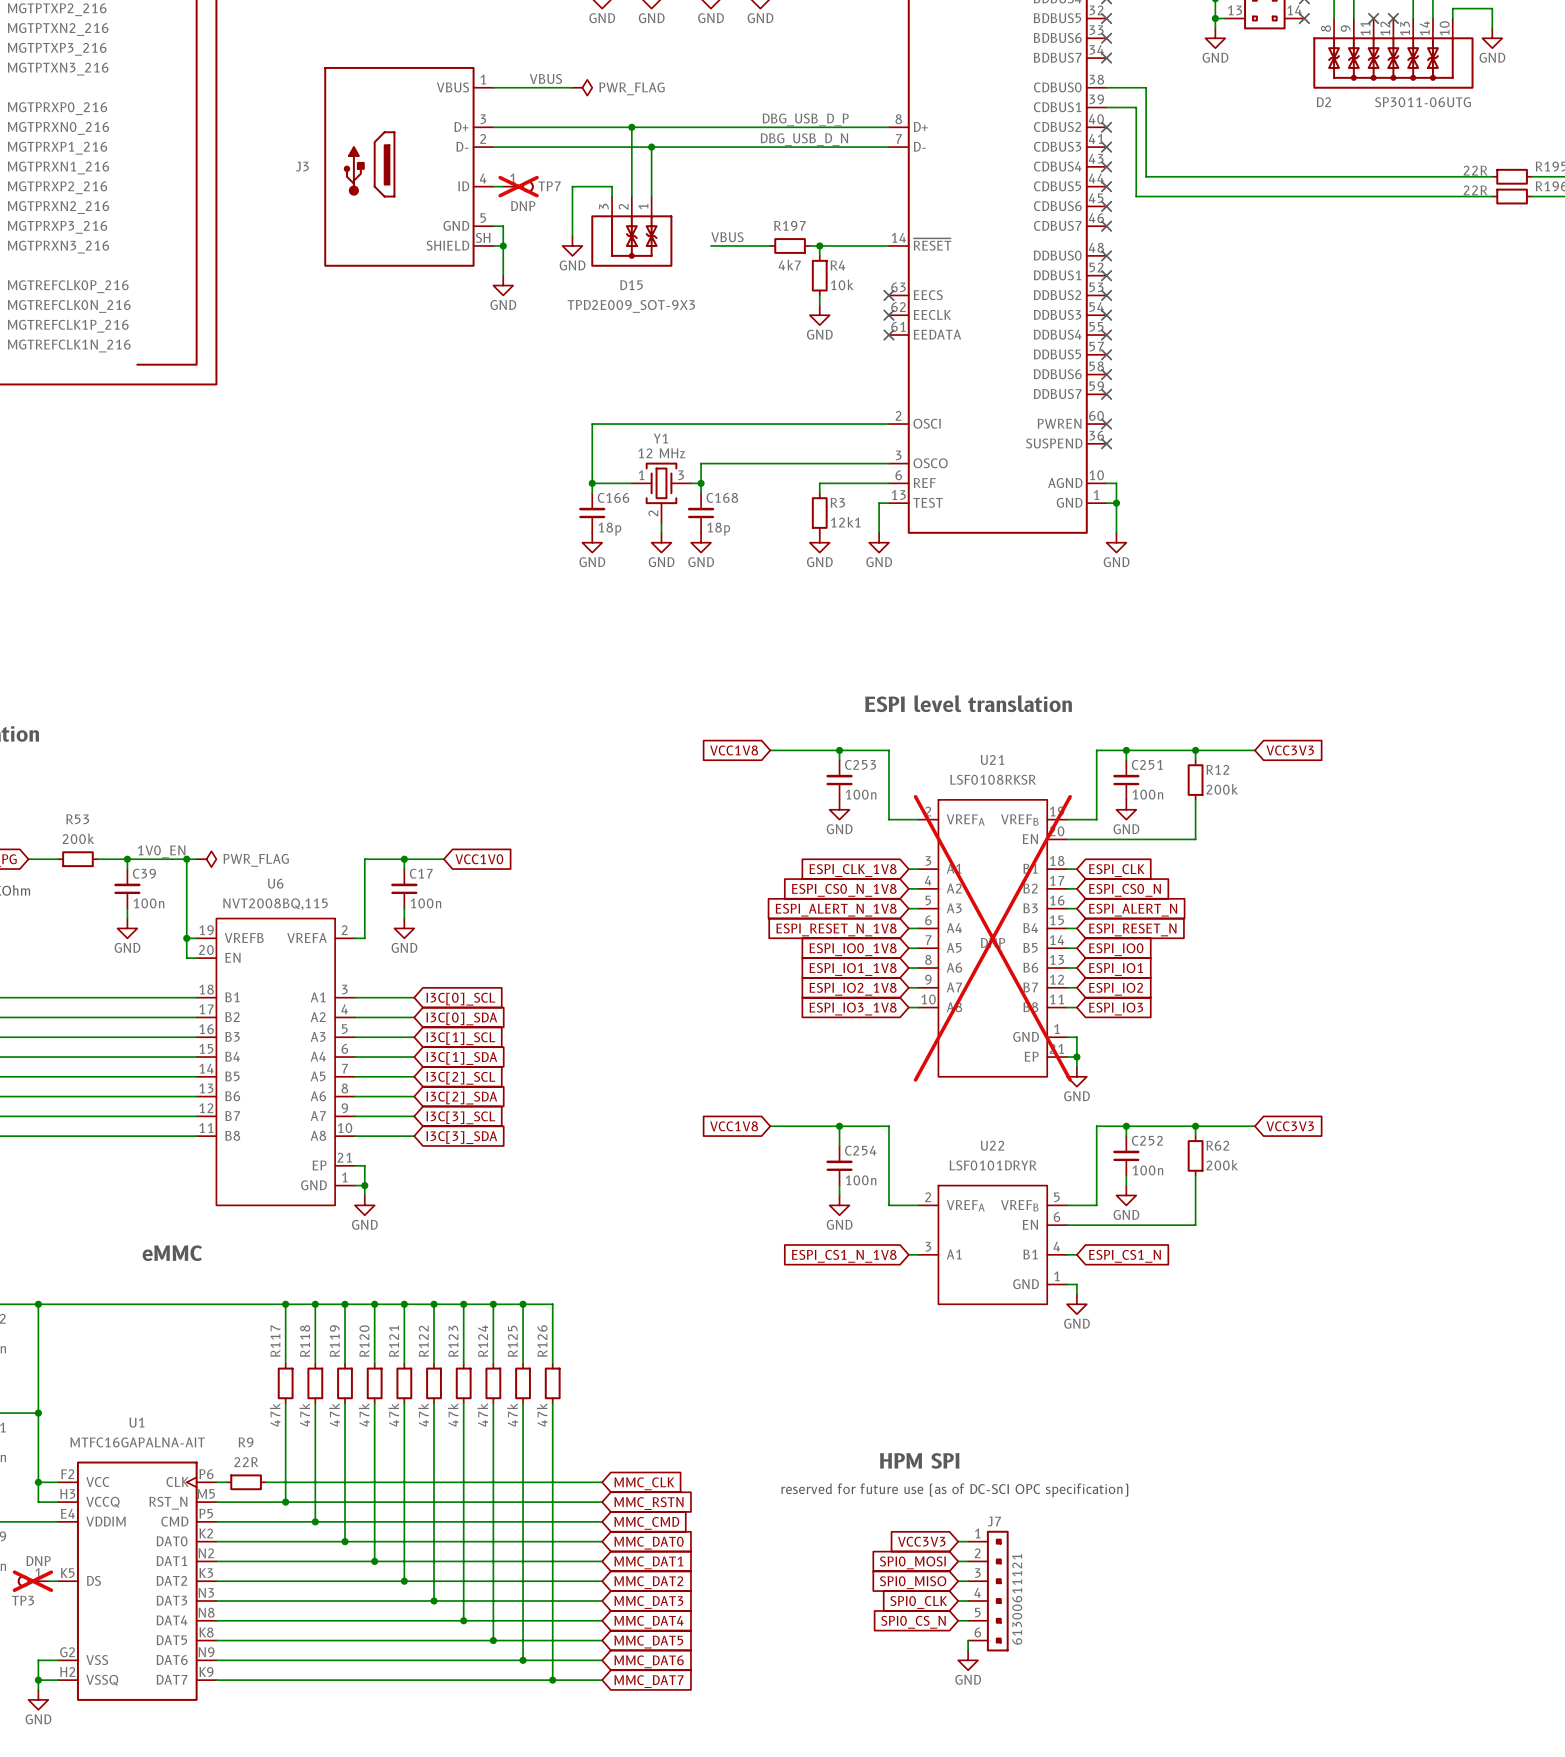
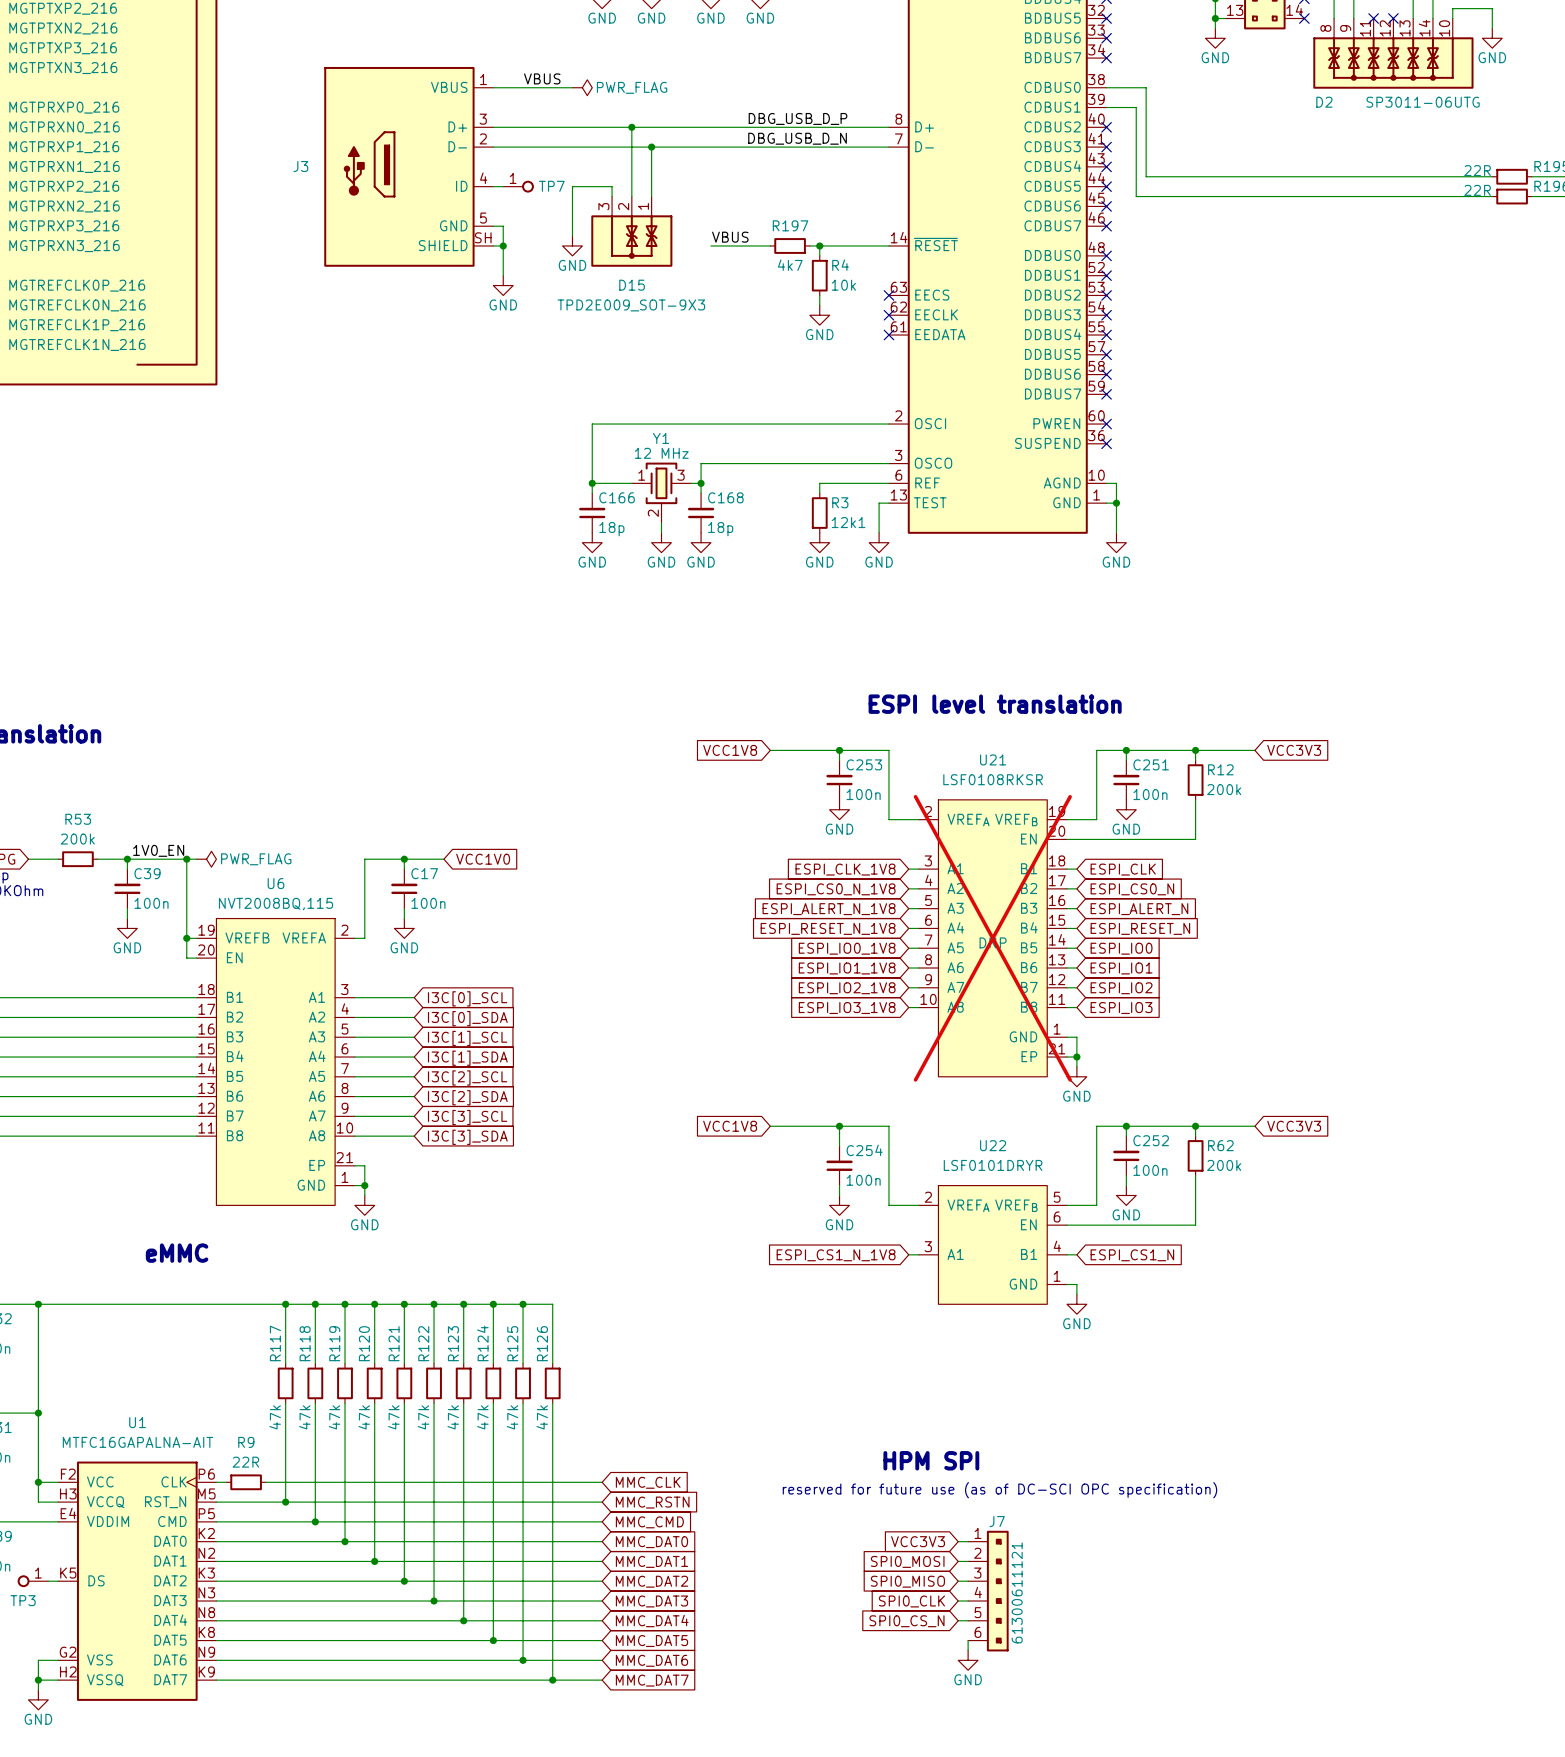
TP7 do-not-place cross: (518, 186) -> none
TP7 text: DNP (523, 206) -> none
TP3 text: DNP (38, 1561) -> none
TP3 do-not-place cross: (32, 1581) -> none

